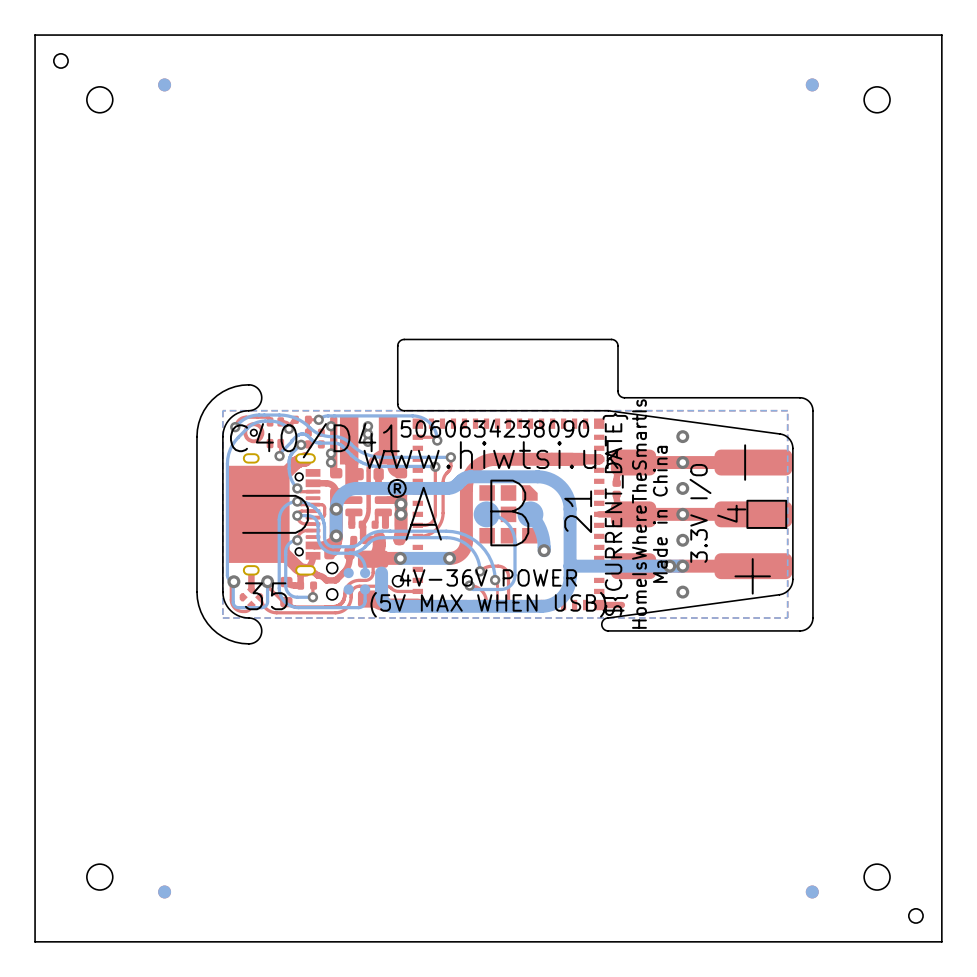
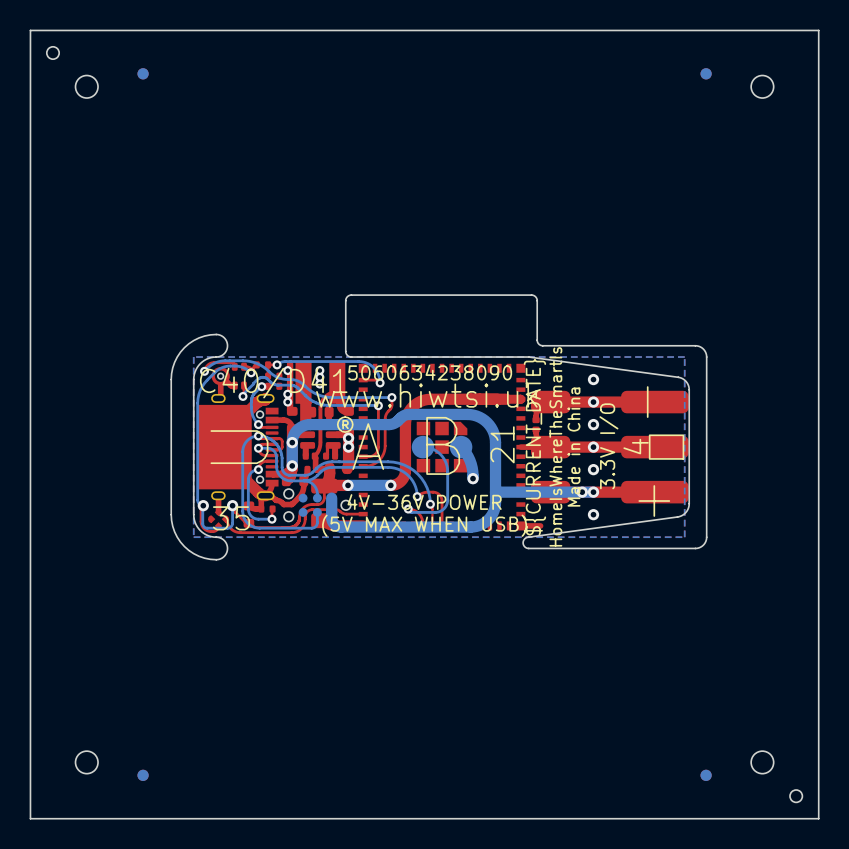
top track: none -> (226, 381) (230, 385) (234, 385)
top track: none -> (220, 385) (220, 396) (218, 398)

